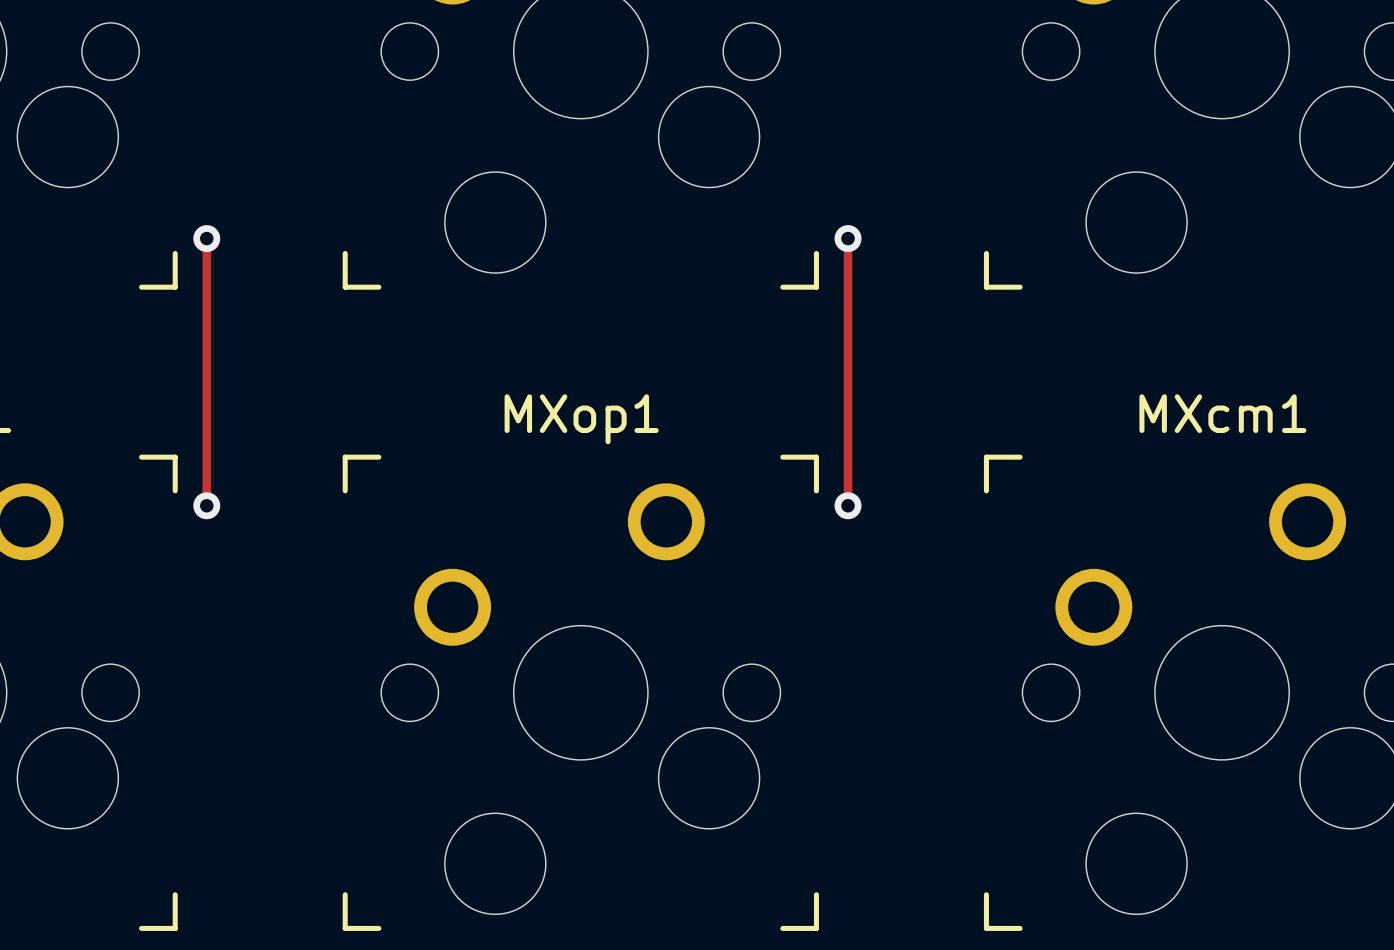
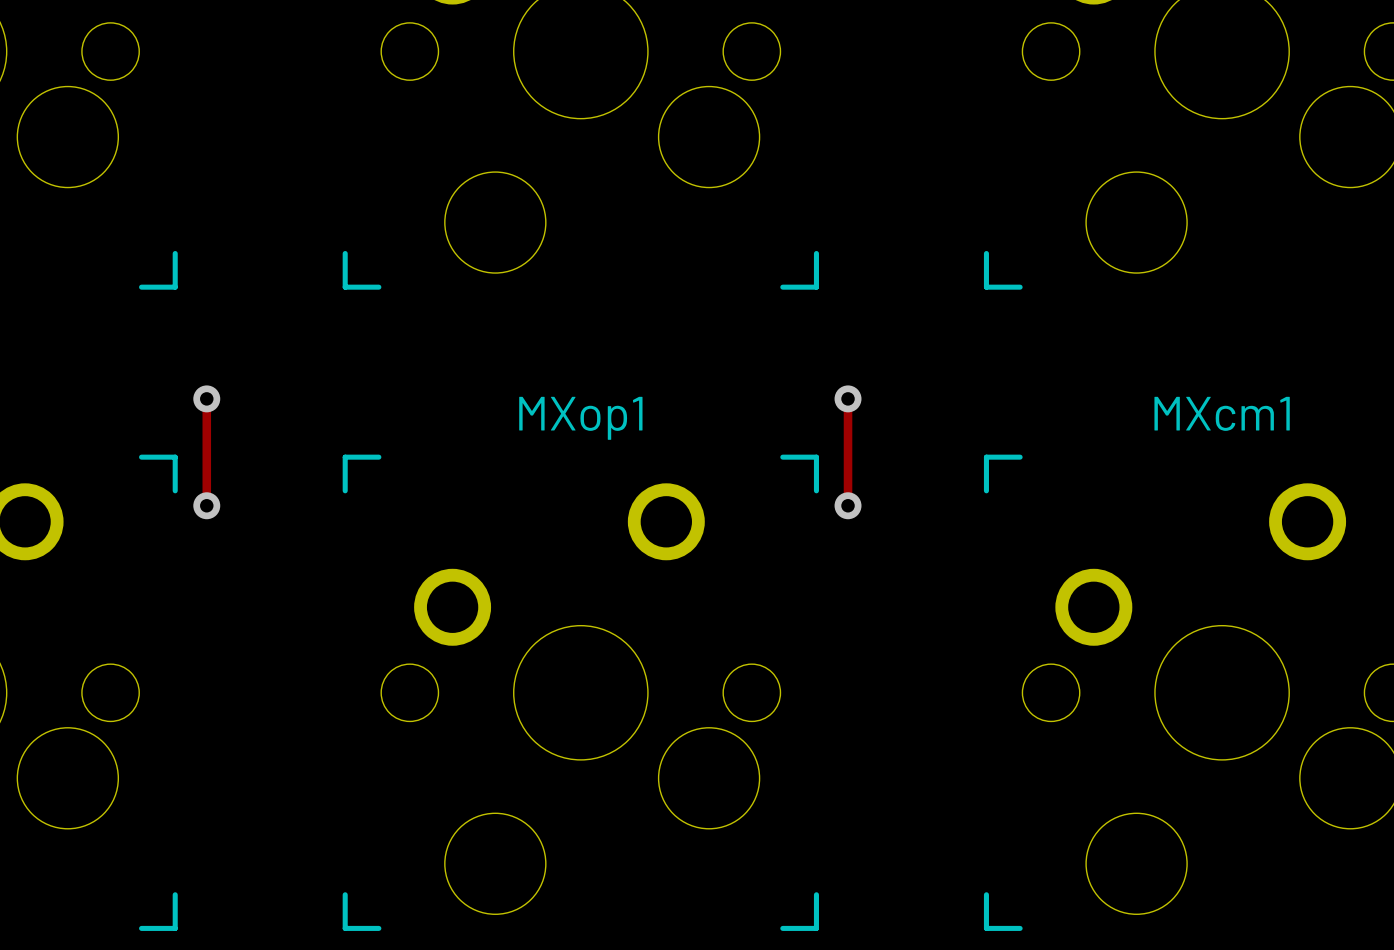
track: (206, 238) (206, 398) -> none
via position: (206, 238) -> (206, 398)
track: (848, 238) (848, 398) -> none
via position: (848, 238) -> (848, 398)

